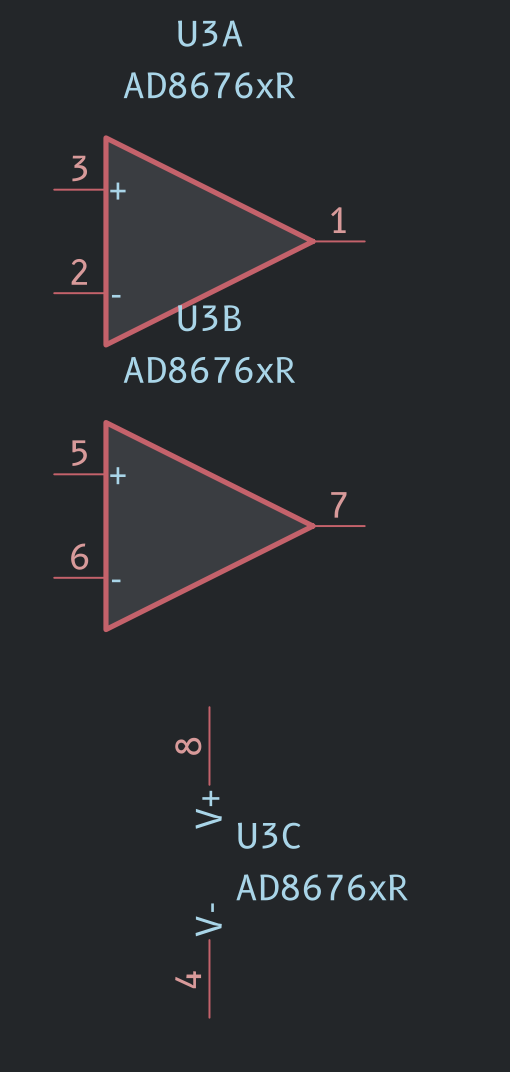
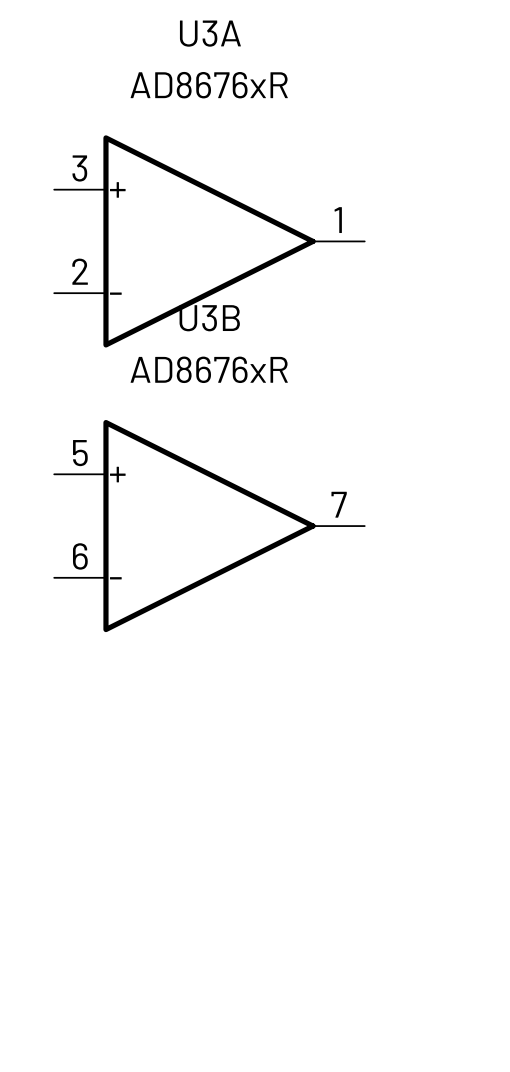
U3C: AD8676xR (209, 862) -> none

